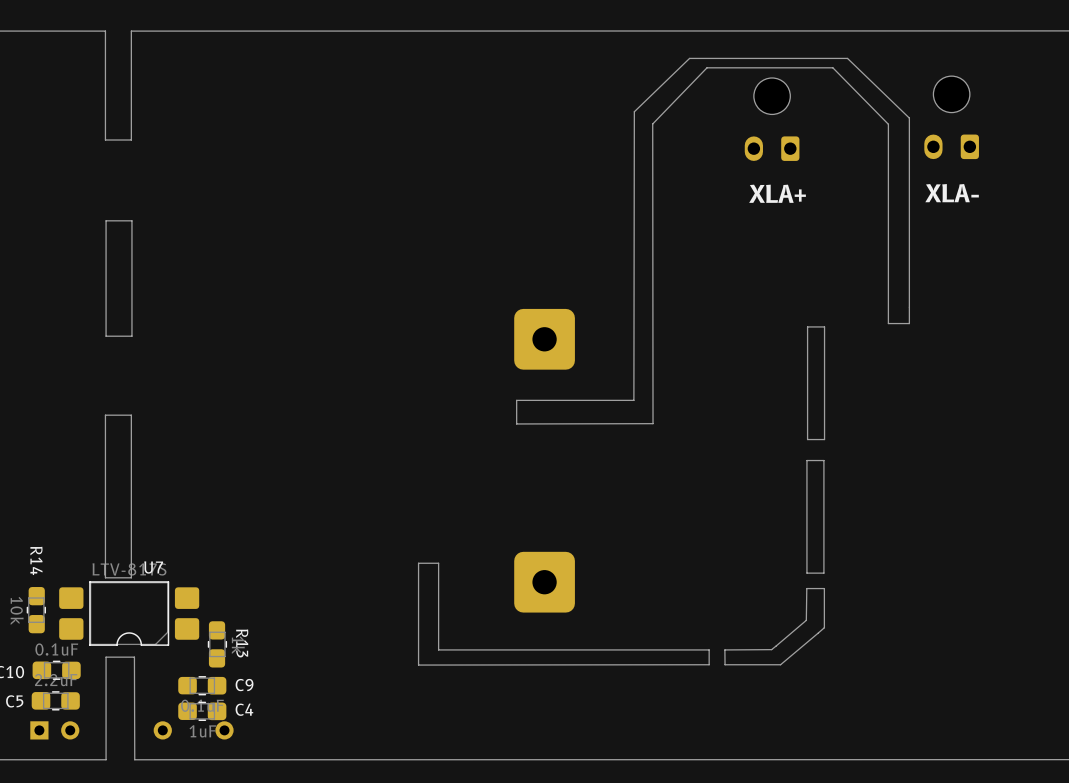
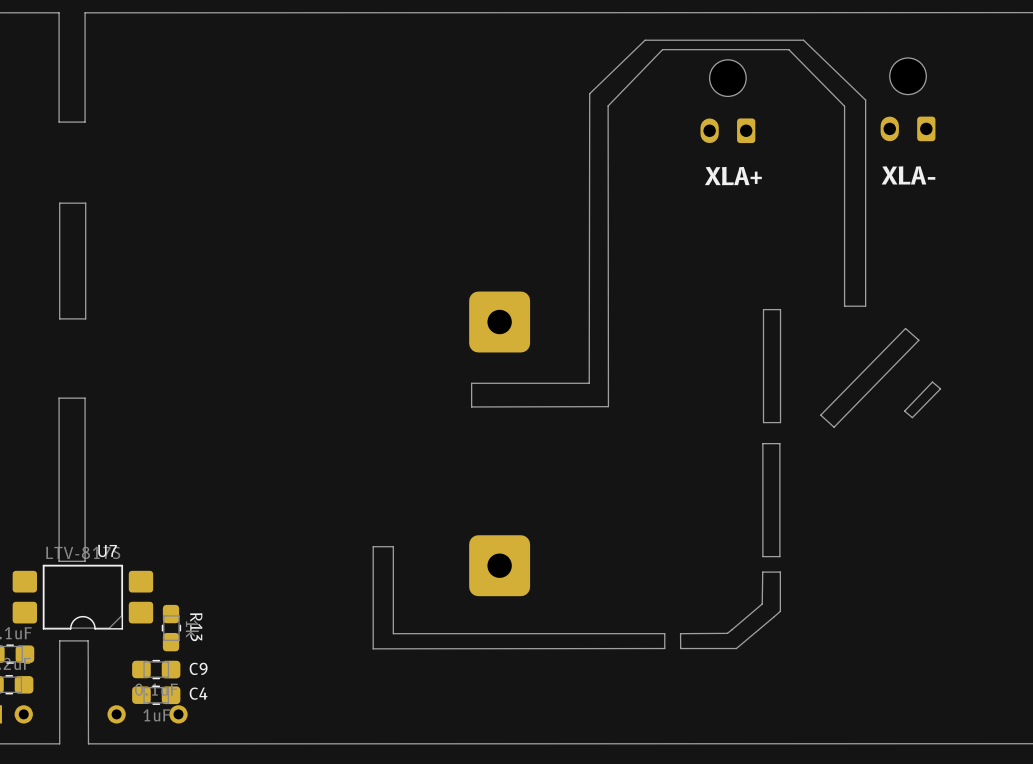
board edge: none -> (905, 328) (820, 415) (834, 427) (918, 340) (905, 328)
board edge: none -> (932, 382) (904, 411) (912, 417) (940, 388) (932, 382)

